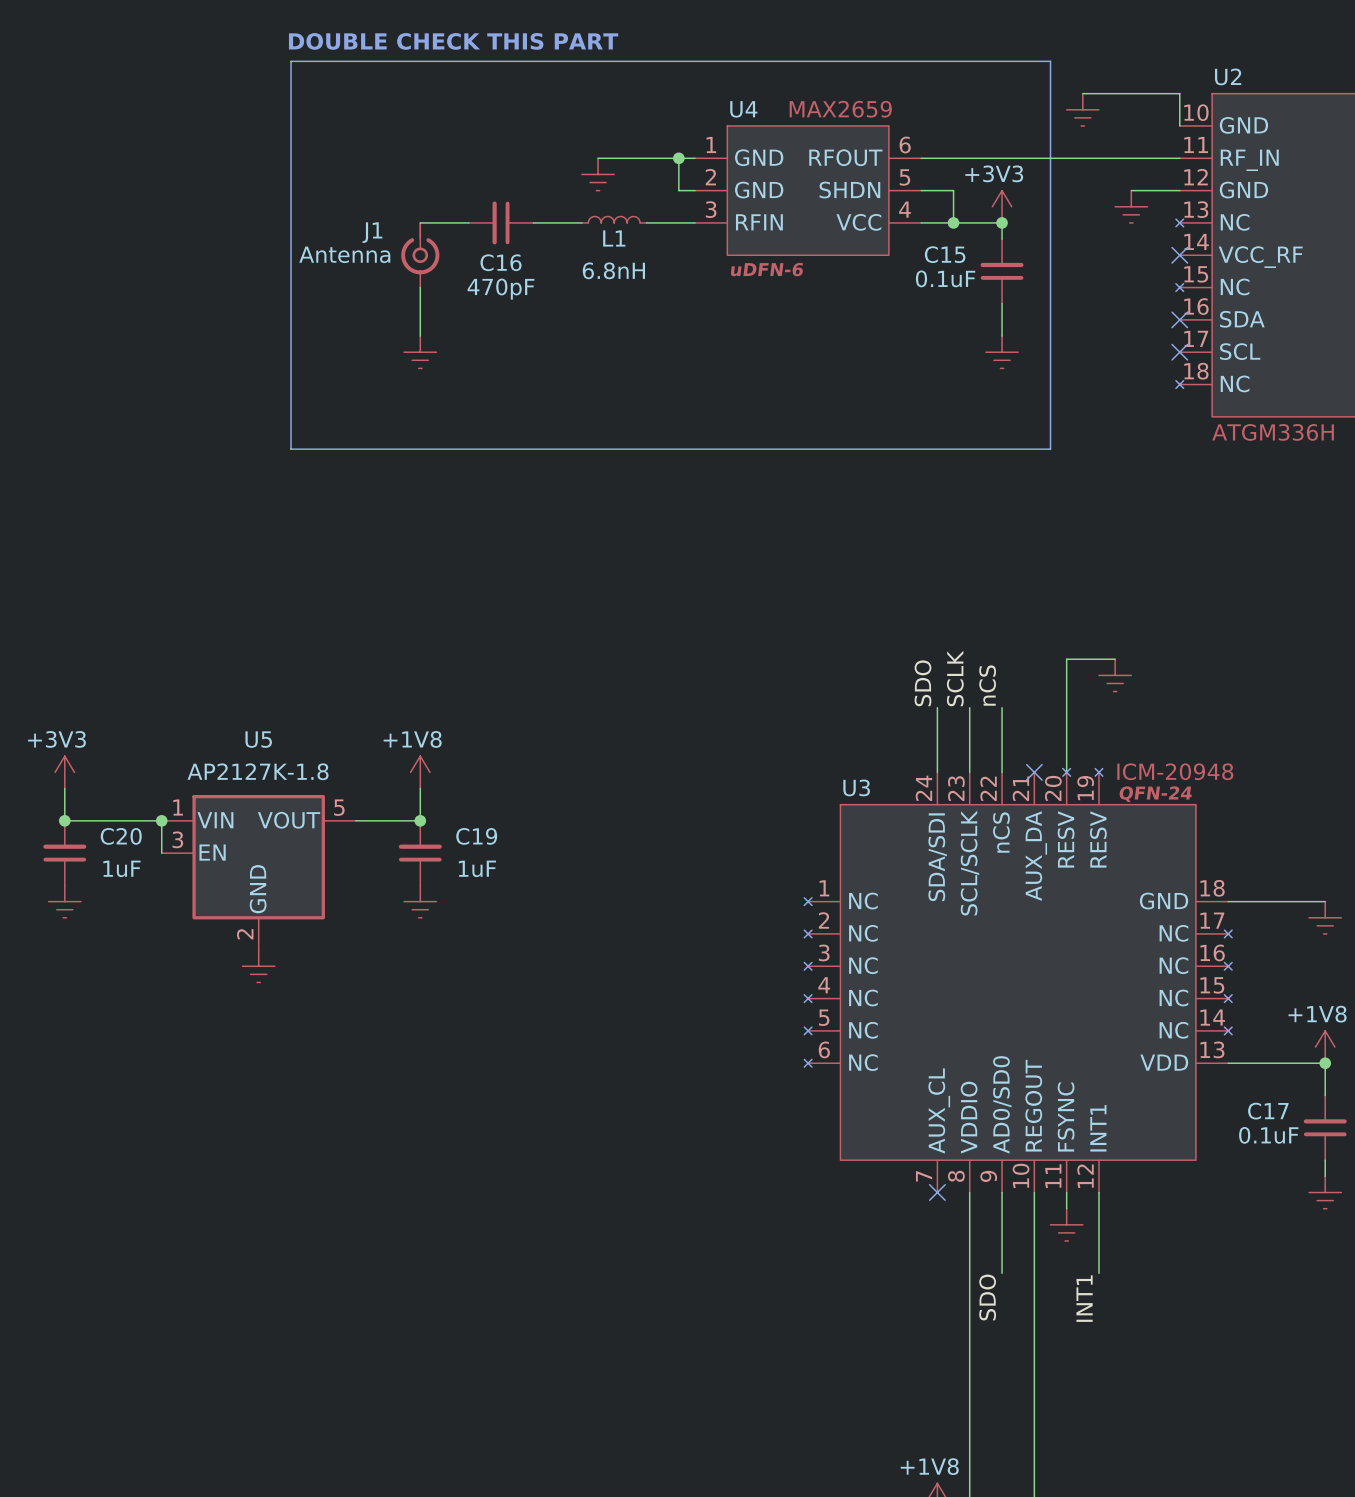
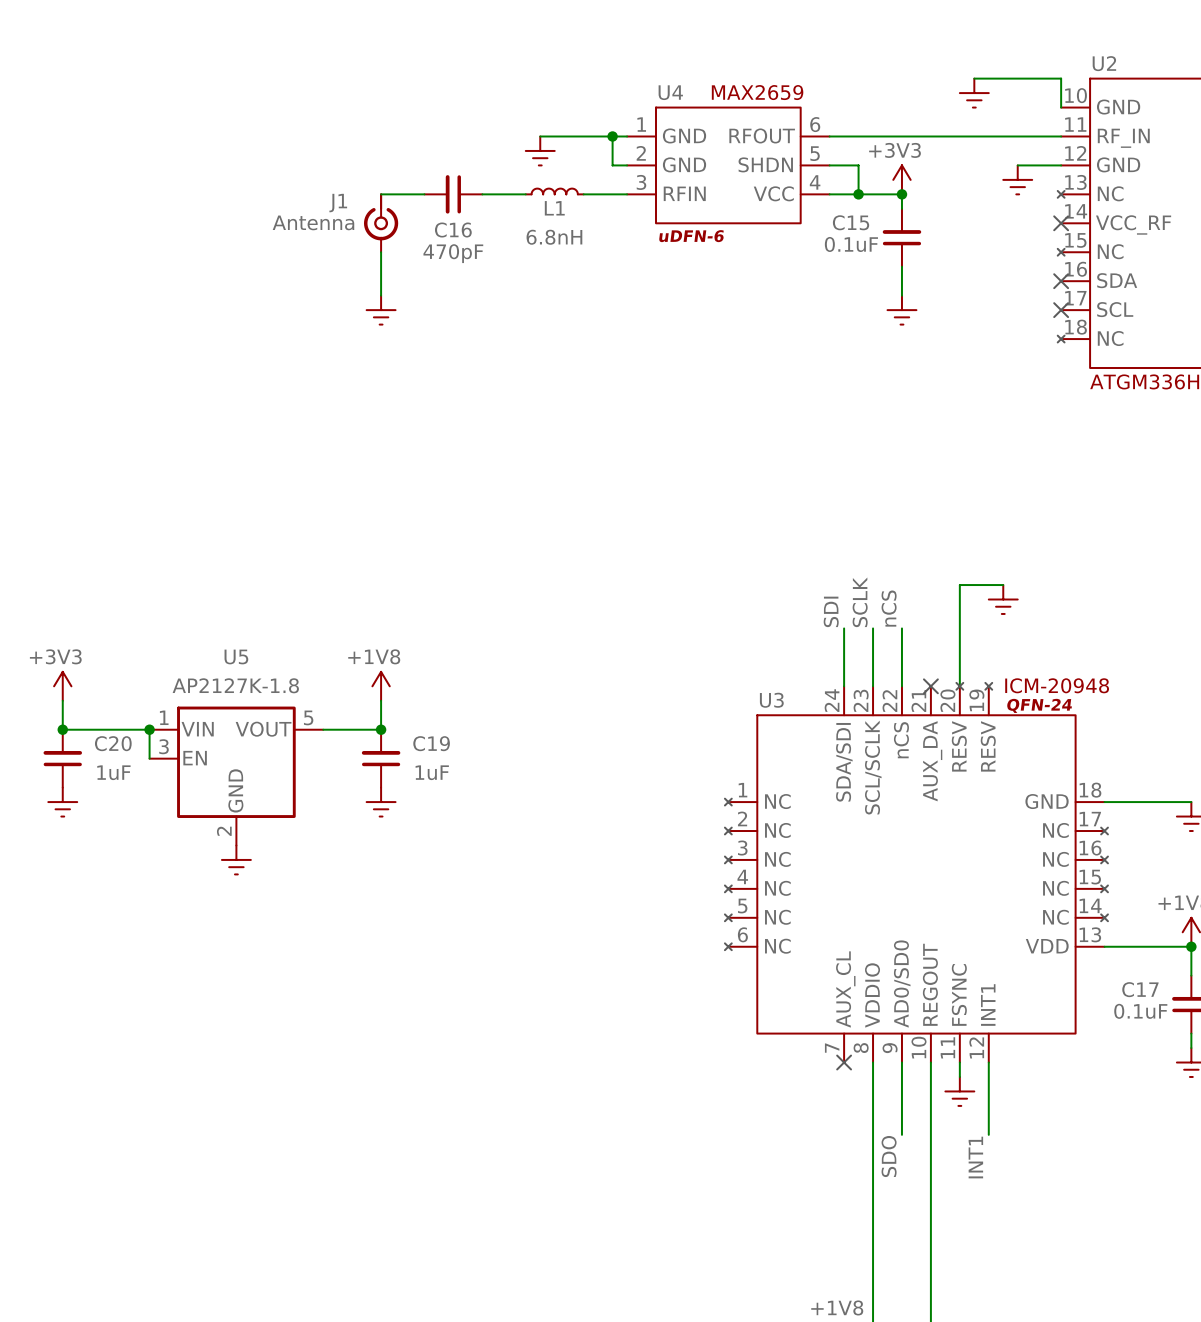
text: DOUBLE CHECK THIS PART (453, 41) -> none
line: (291, 61) (1050, 61) (1050, 449) (291, 449) (291, 61) -> none
label: SDO (922, 683) -> SDI (831, 611)

